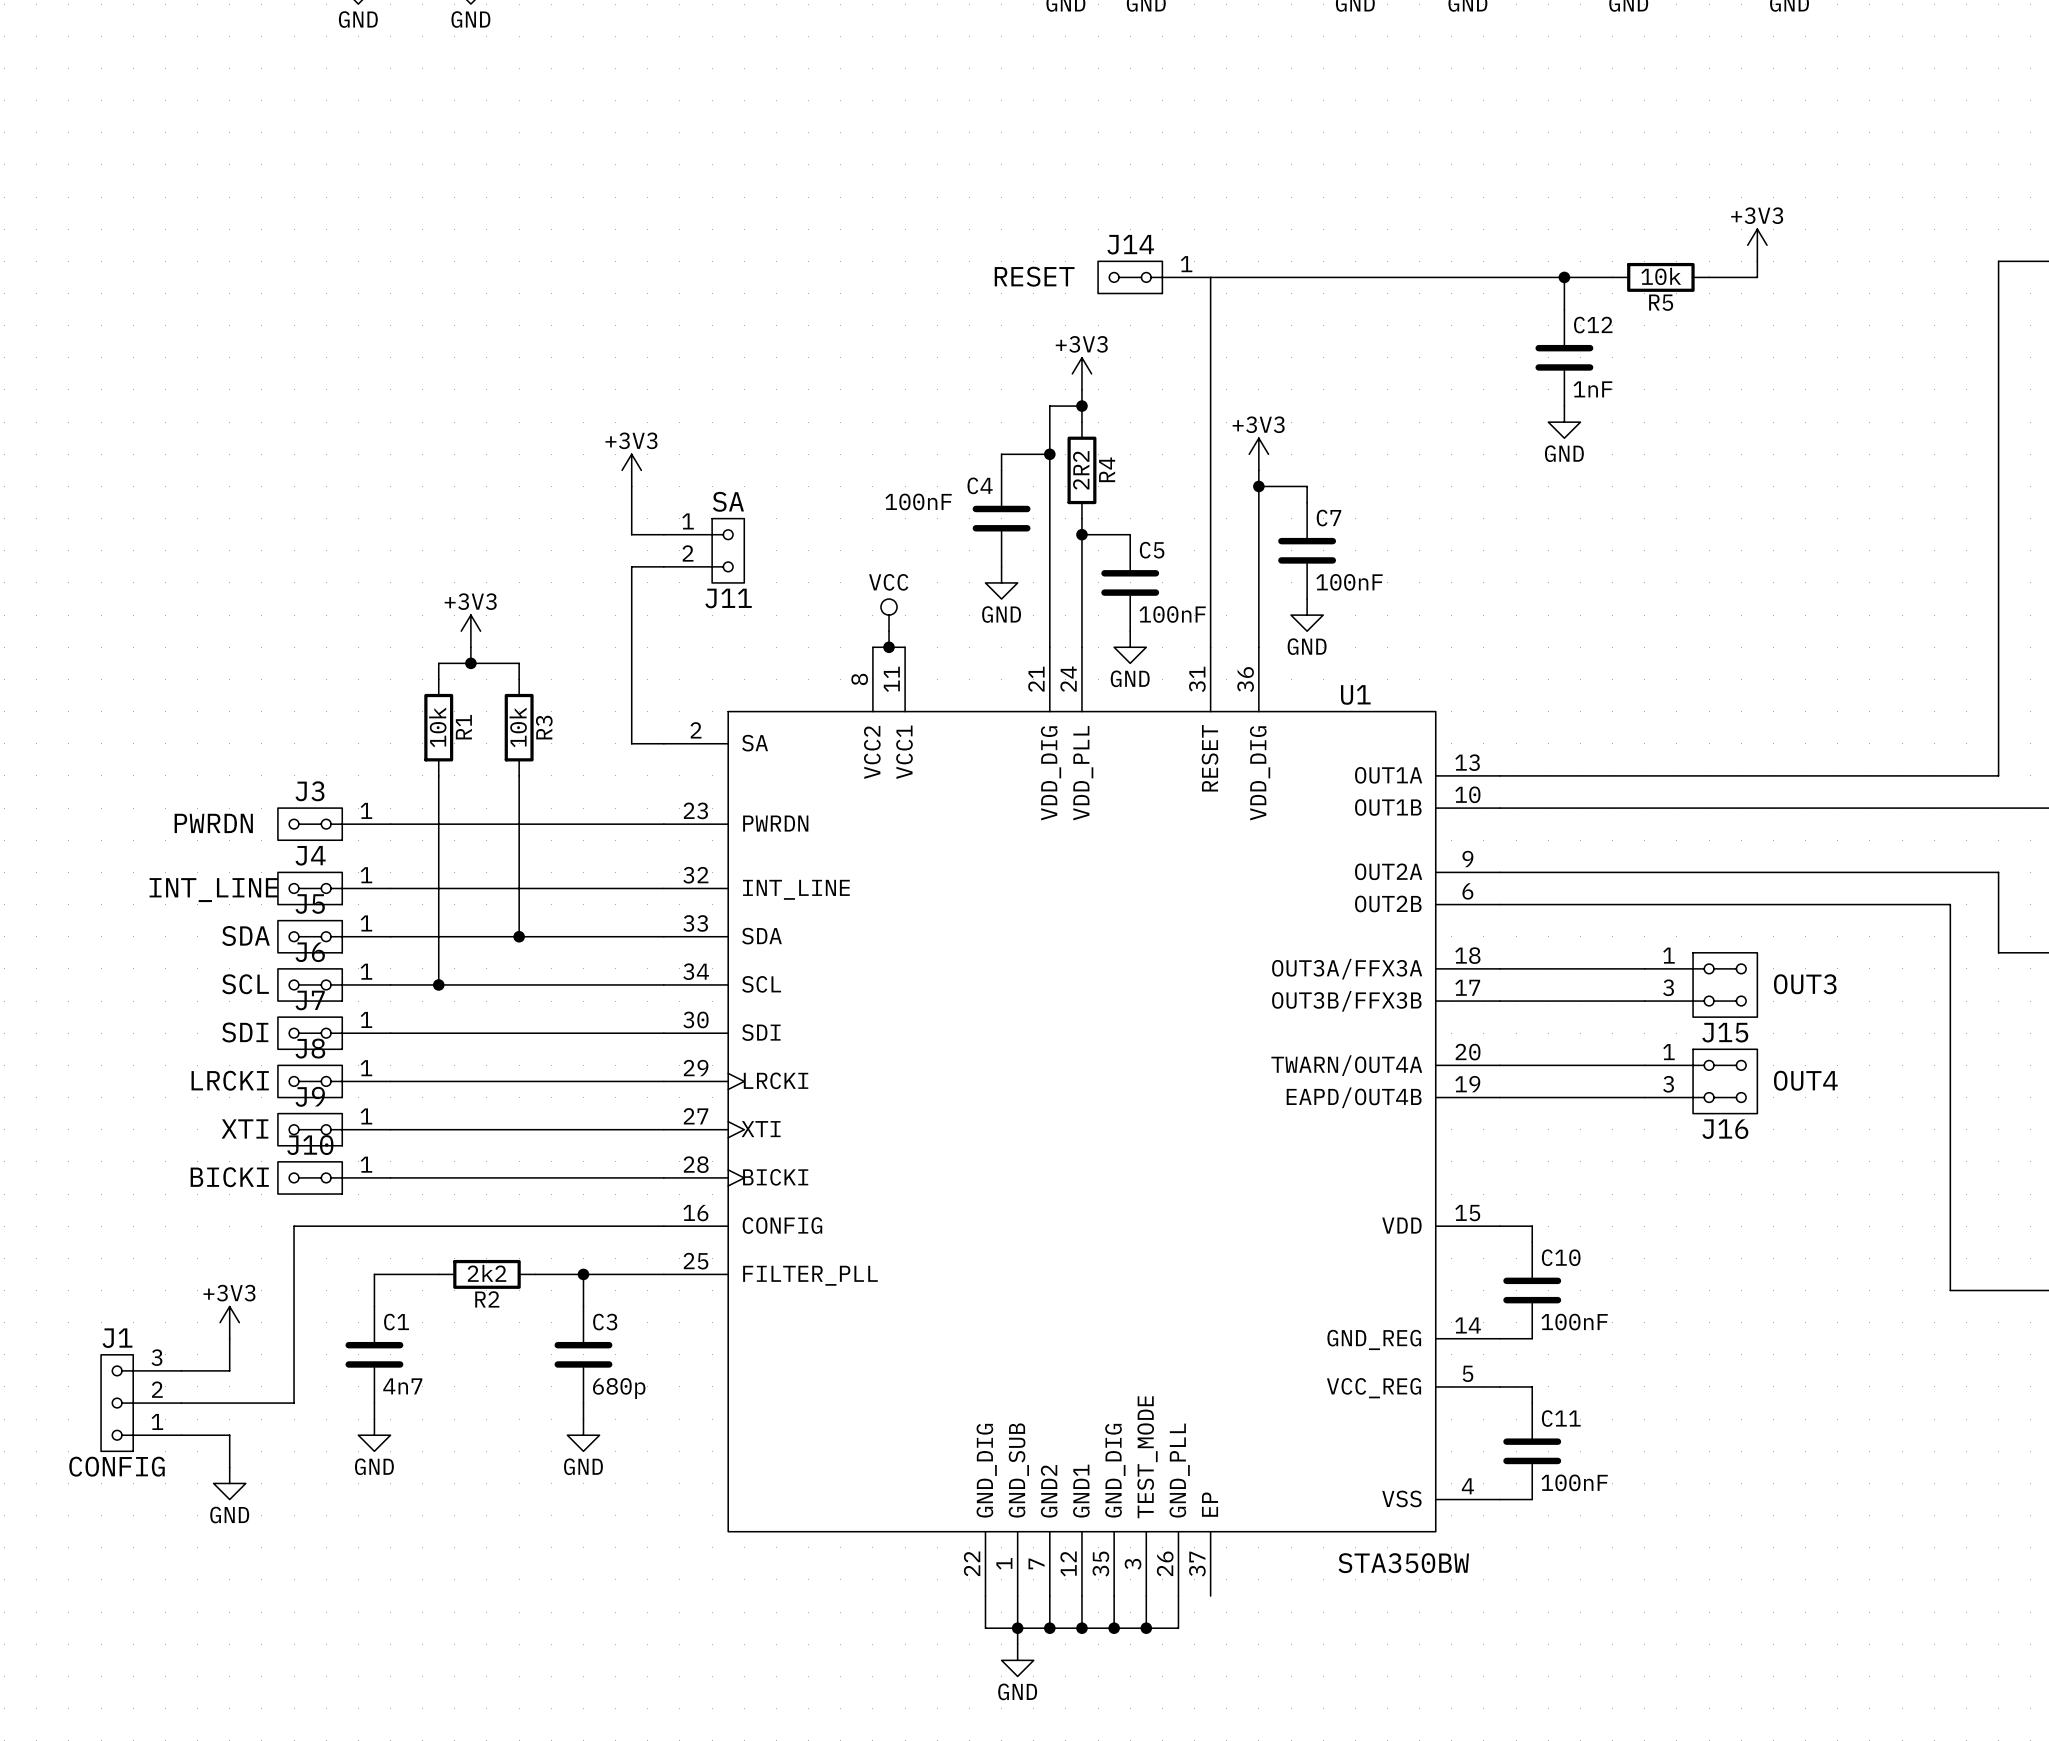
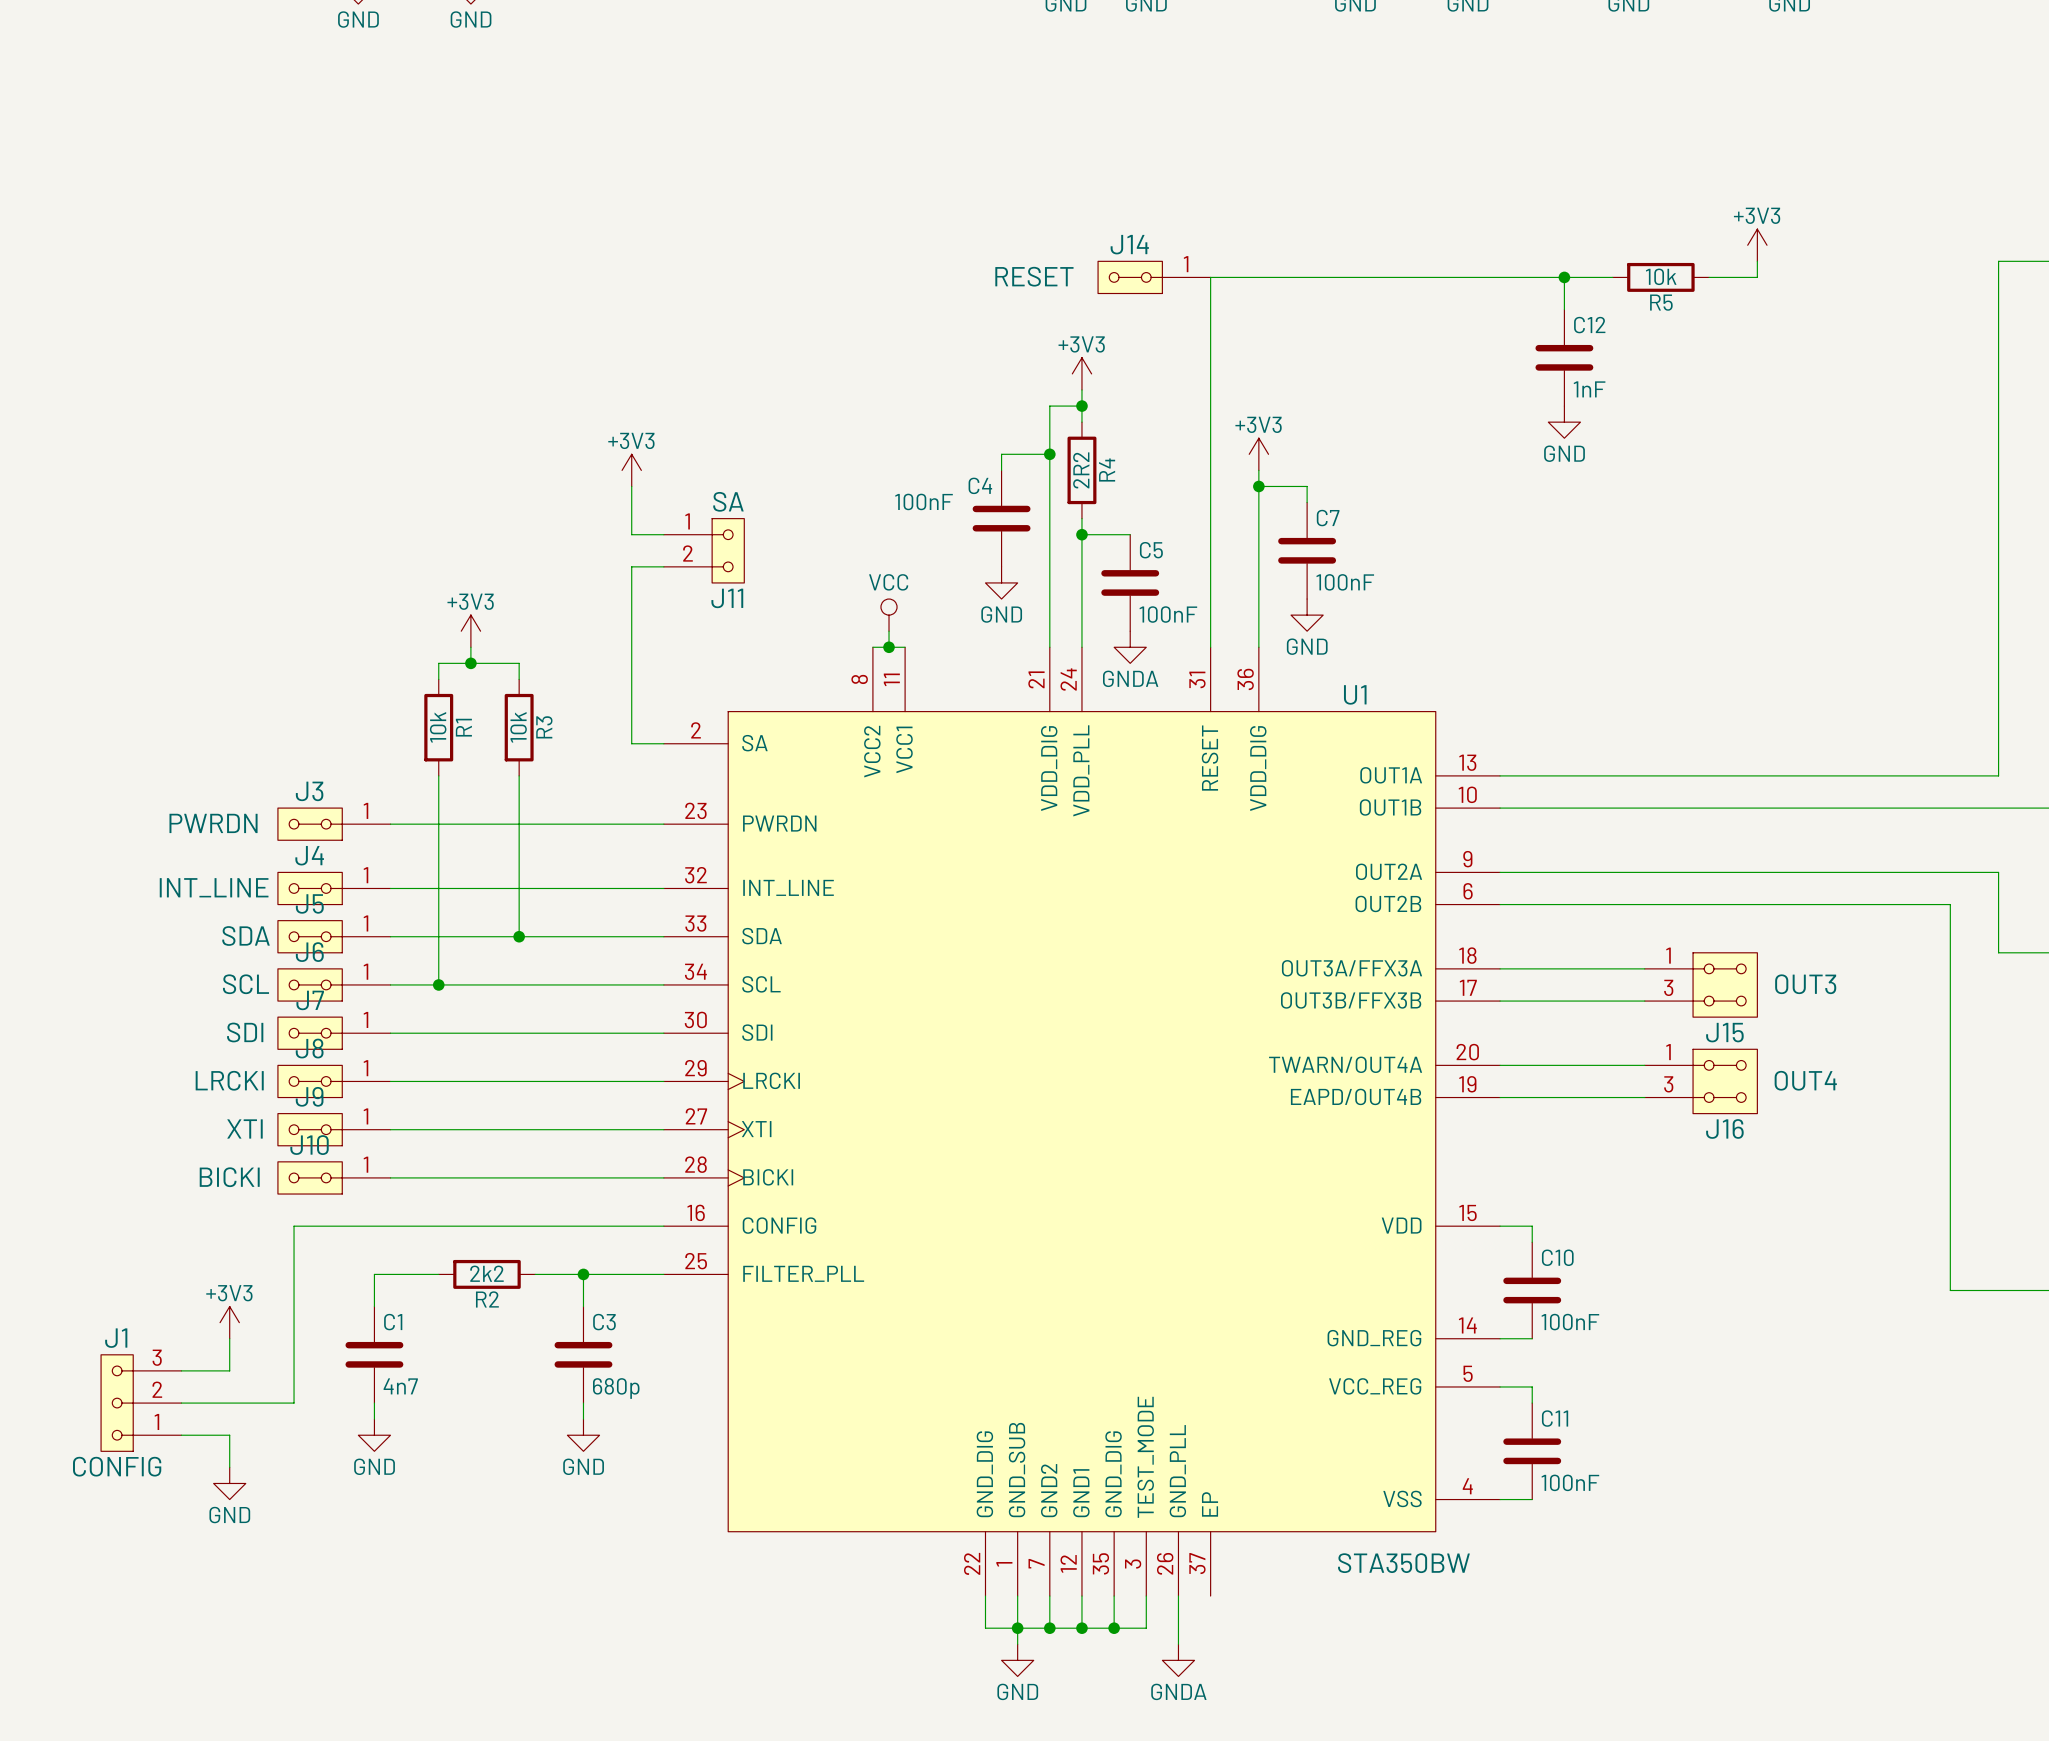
power symbol: GND (1130, 647) -> GNDA (1130, 647)
wire: (1146, 1628) (1178, 1628) -> (1178, 1644) (1178, 1628)
junction: (1146, 1628) -> none
power symbol: none -> GNDA (1178, 1660)

